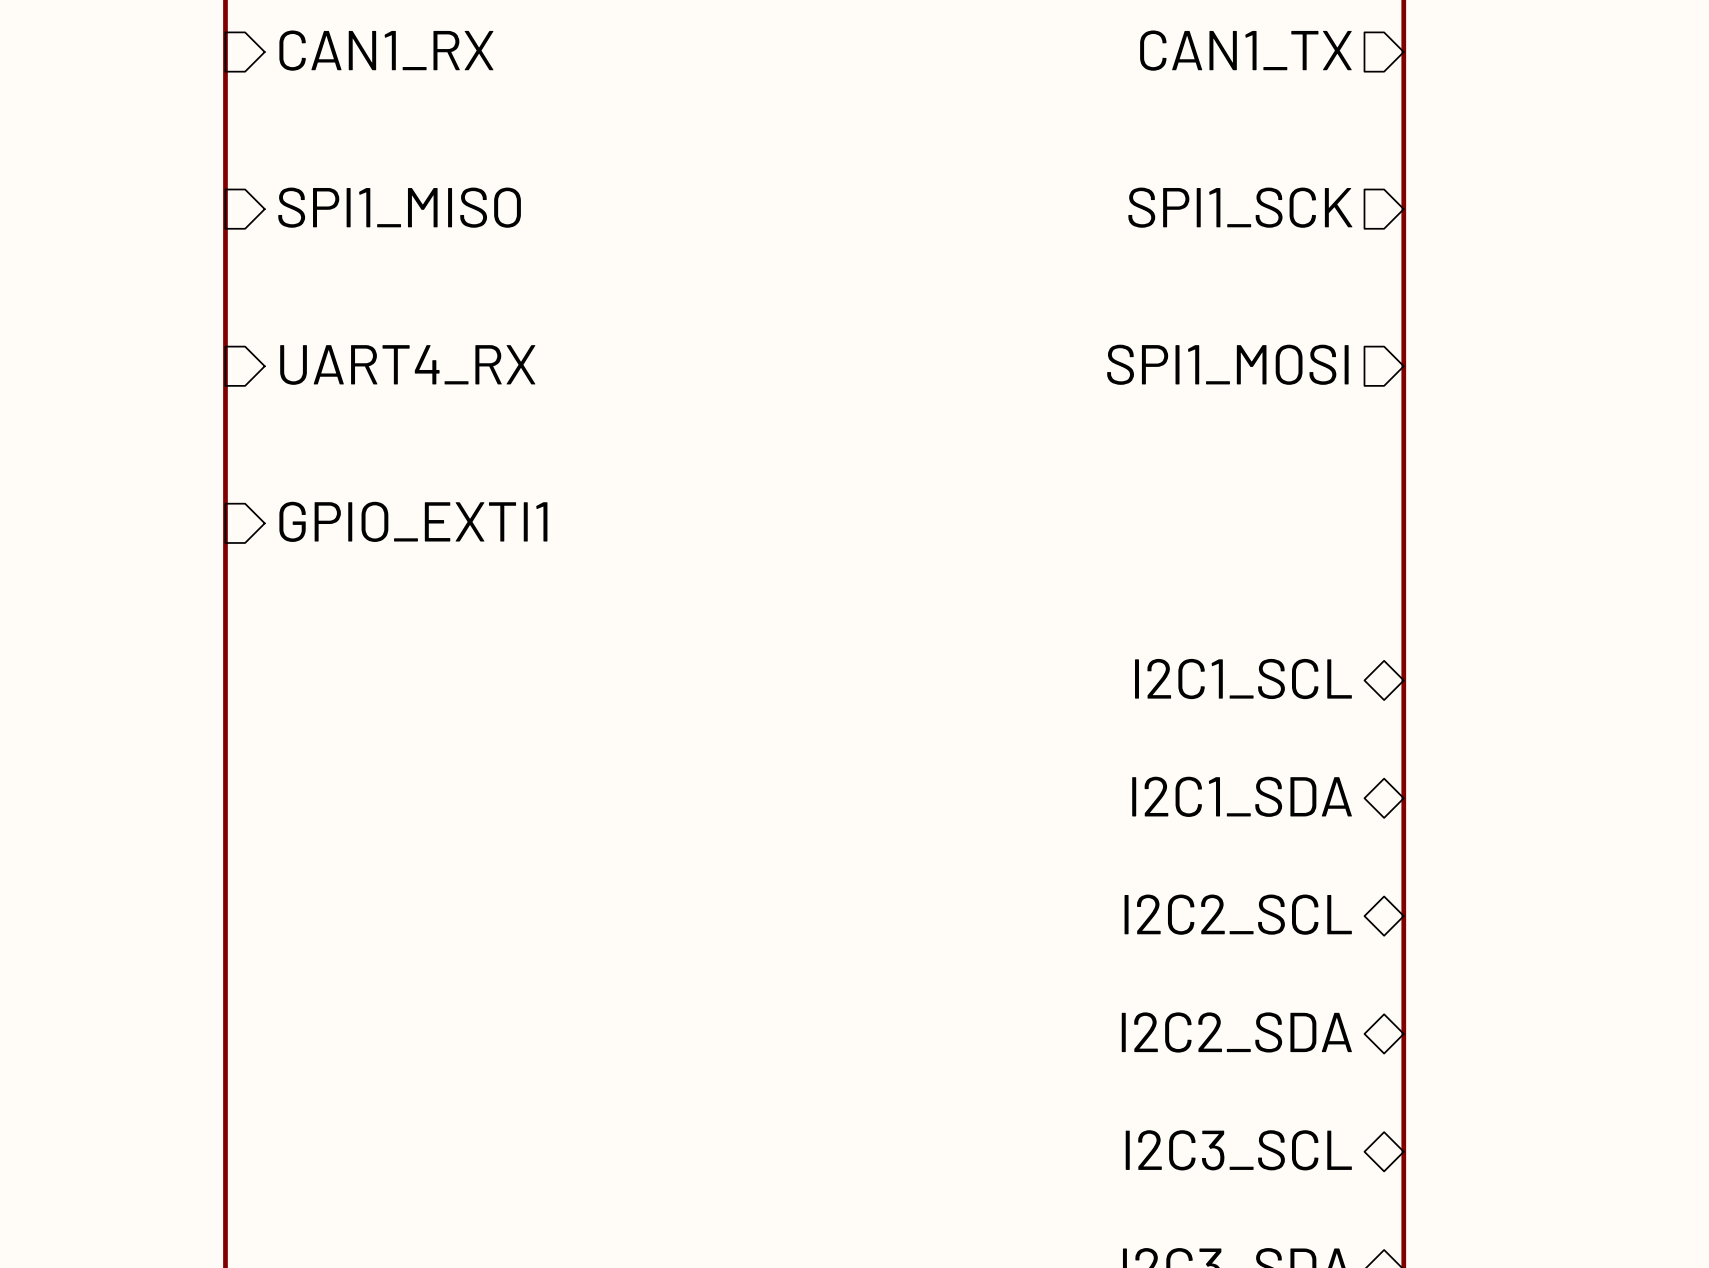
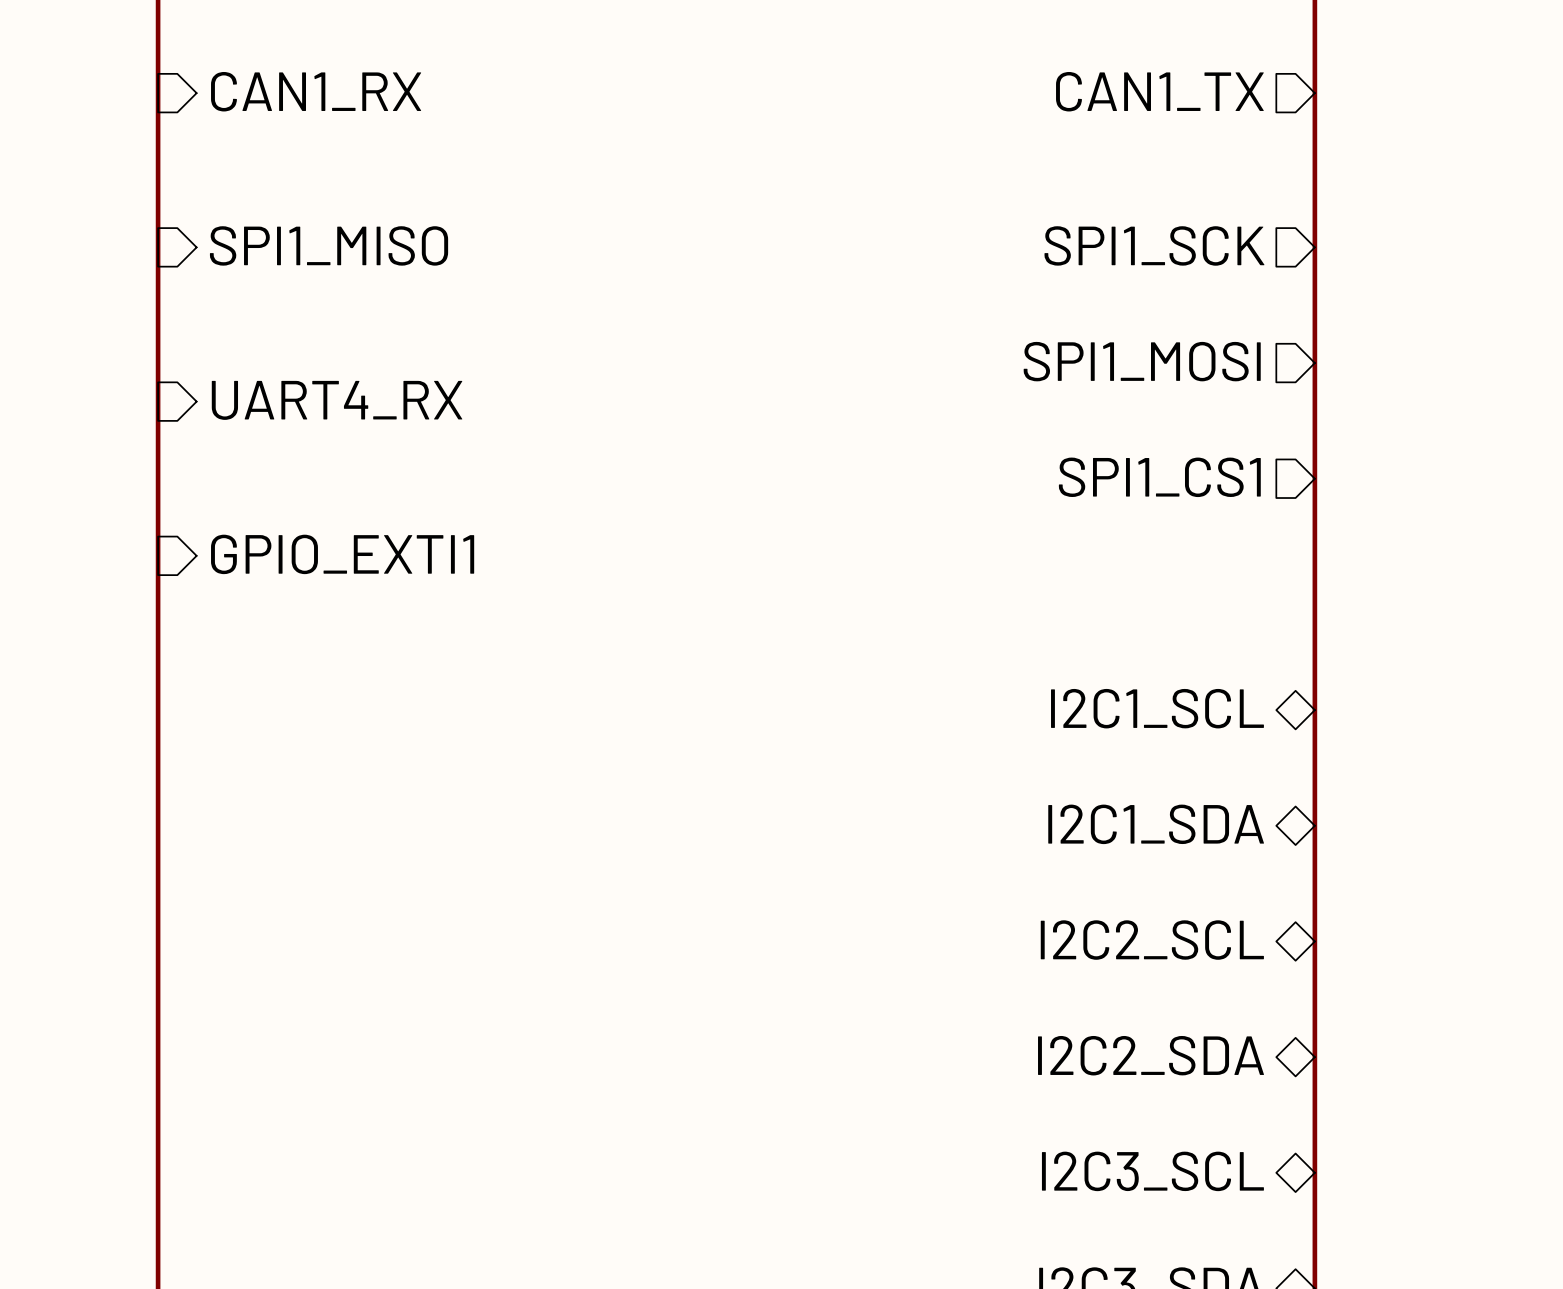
sheet pin position: SPI1_MOSI (1227, 364) -> SPI1_MOSI (1142, 361)
sheet pin: none -> SPI1_CS1 (1159, 477)

